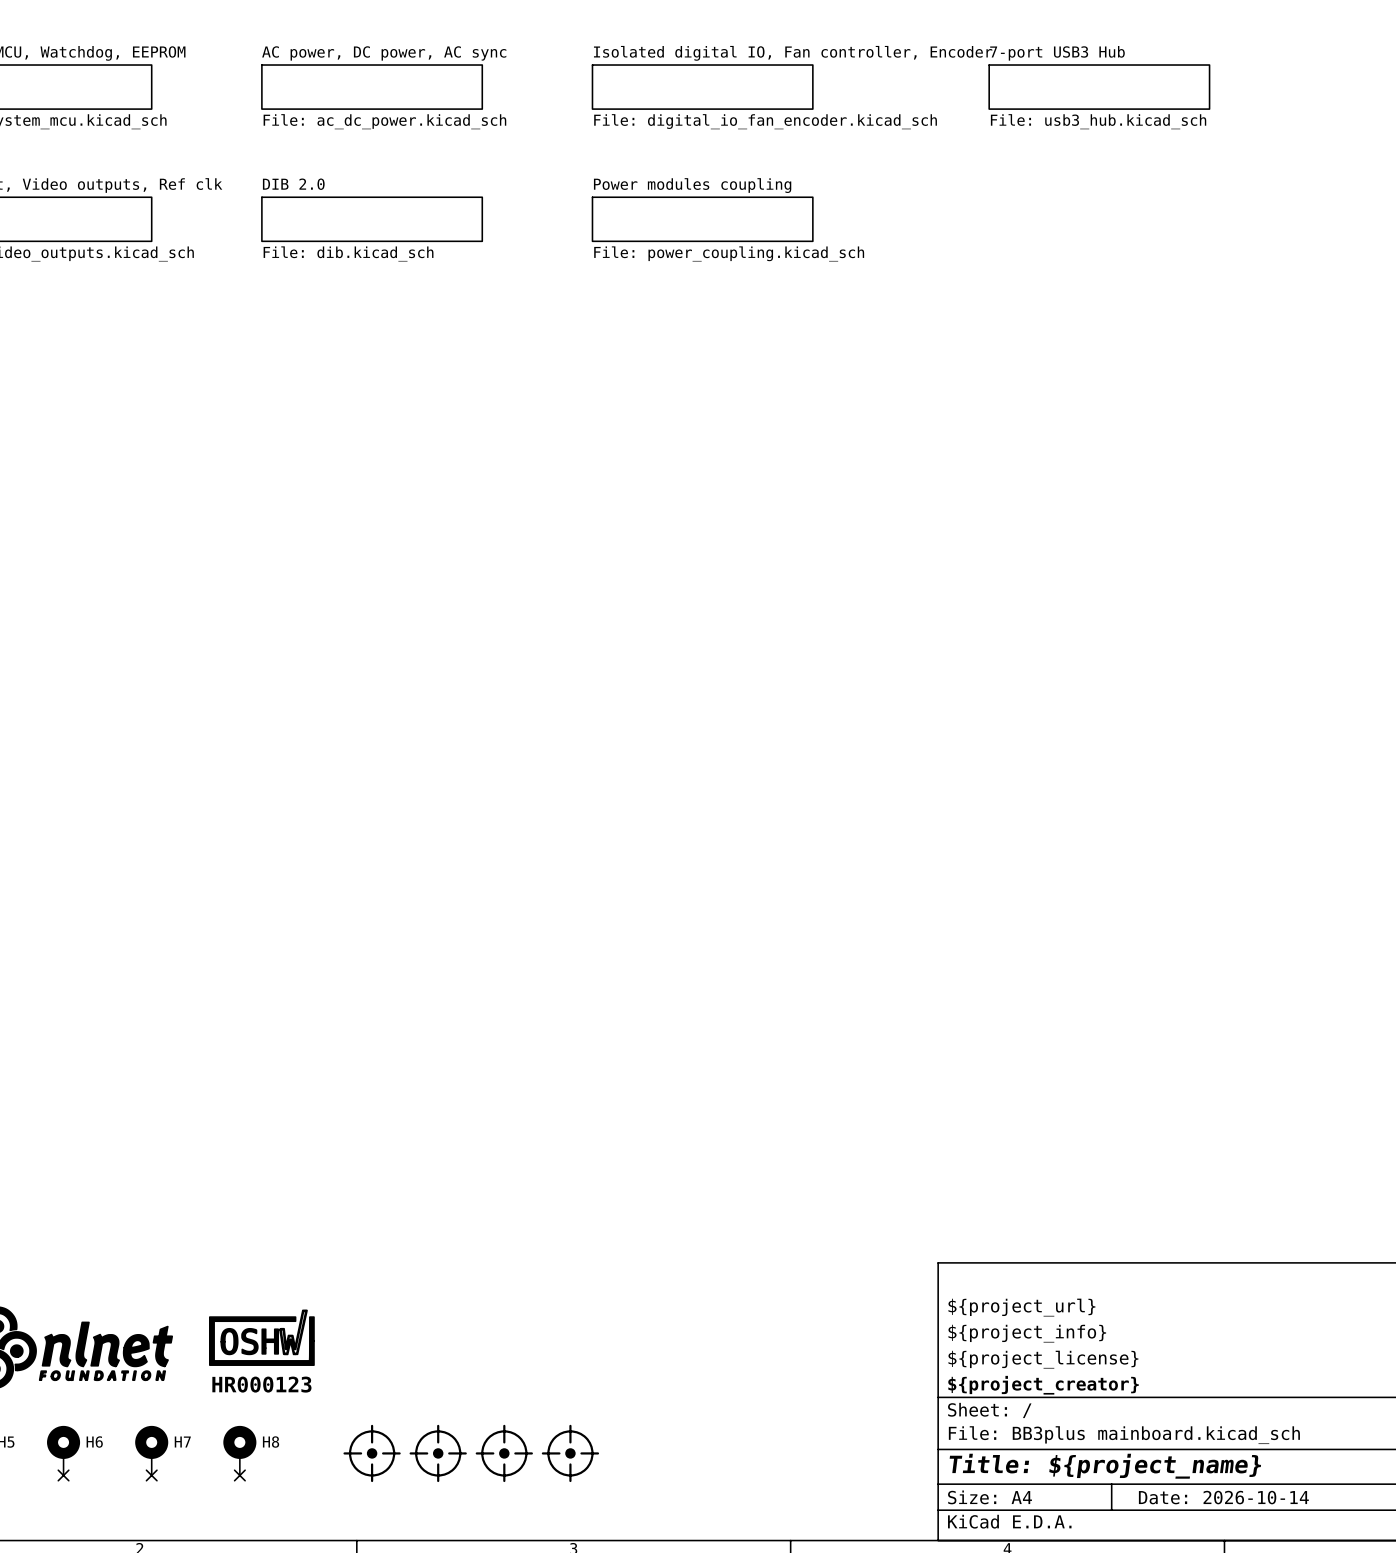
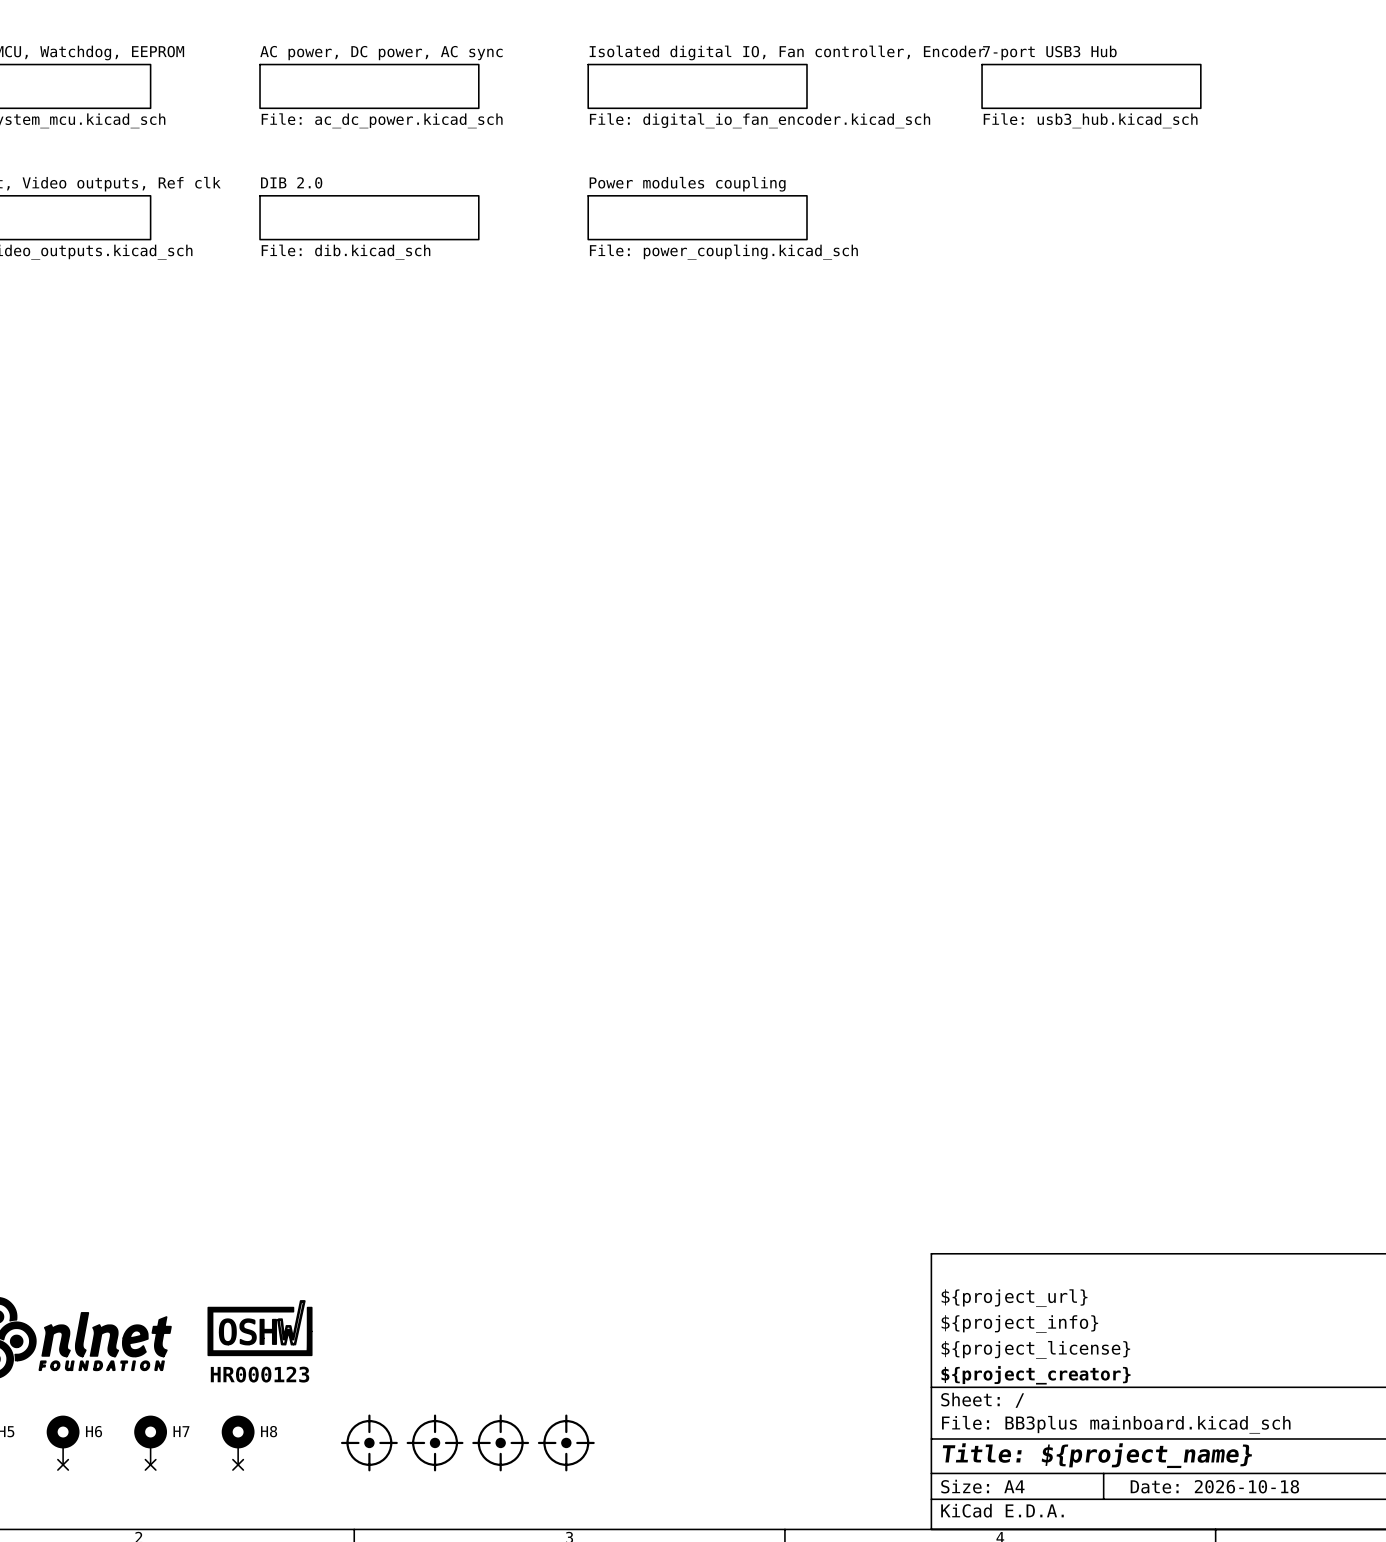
title block: Date: 2026-10-14 (1223, 1497) -> Date: 2026-10-18 (1214, 1486)

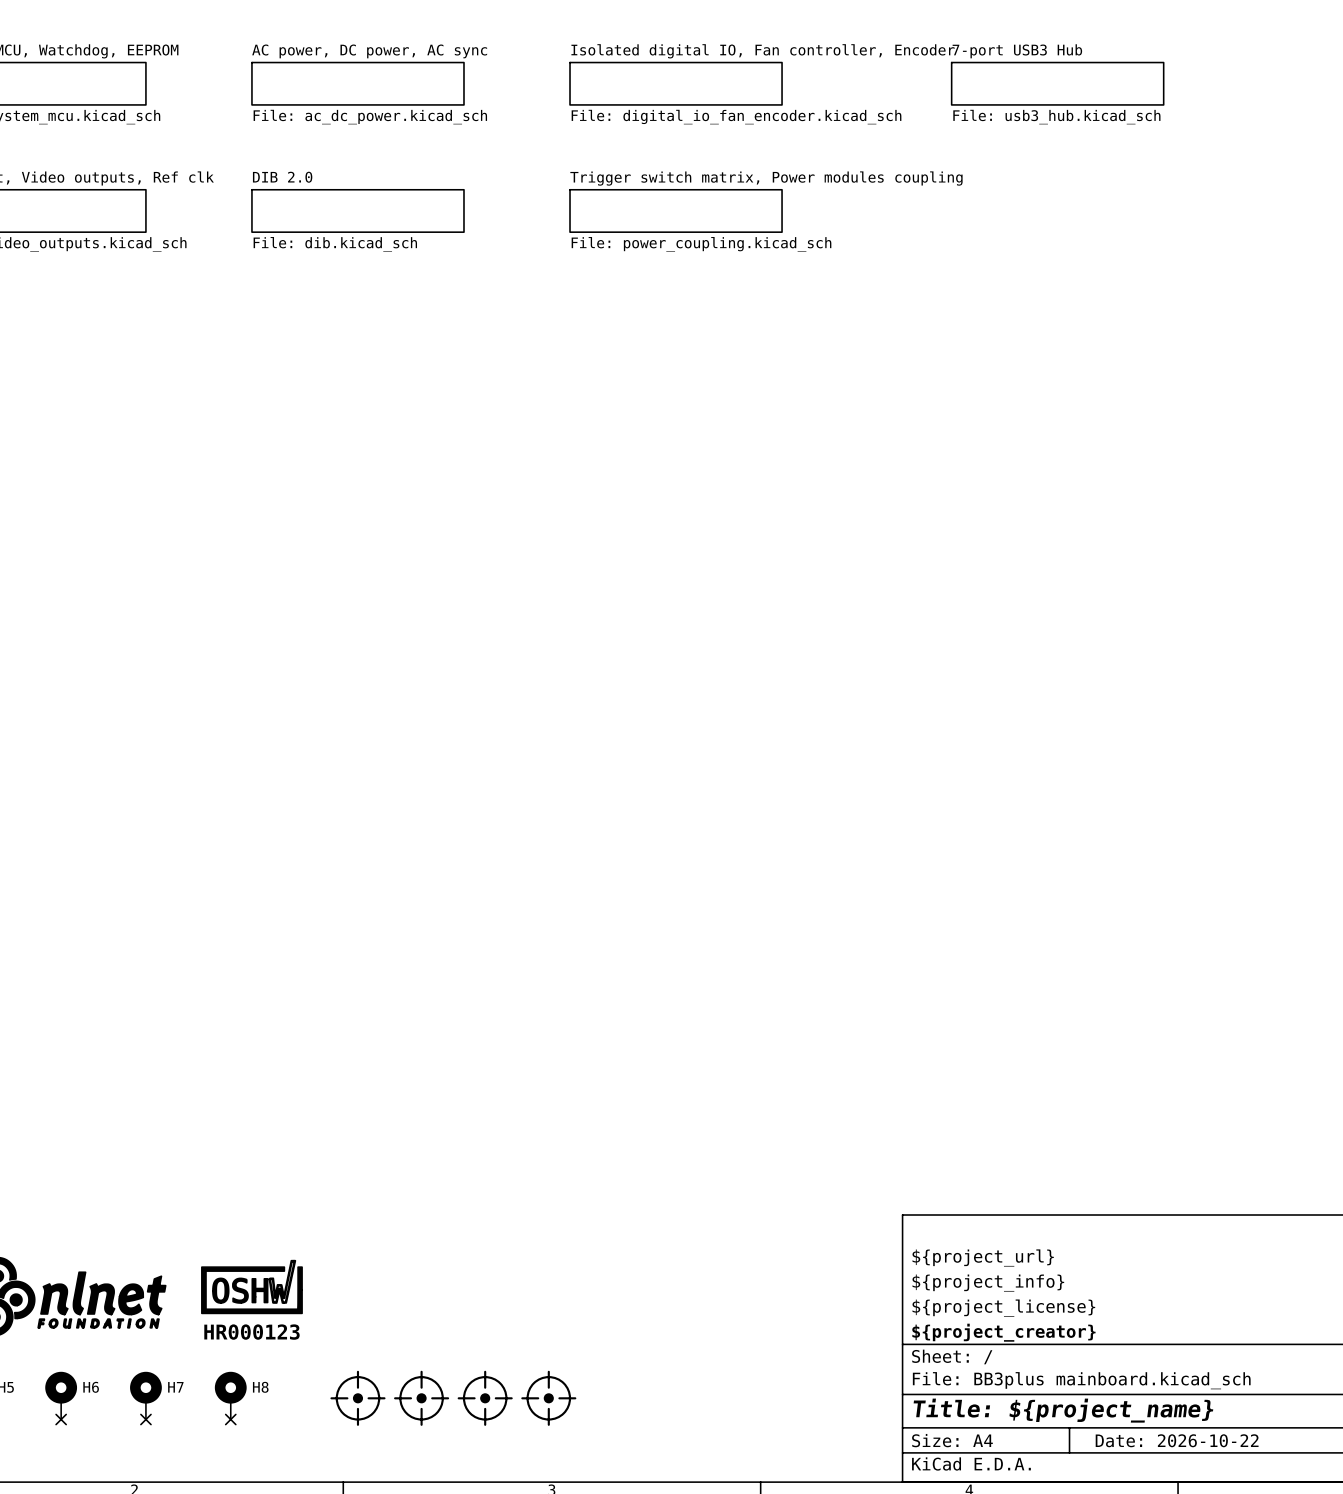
sheet Power modules coupling name: Power modules coupling (687, 184) -> Trigger switch matrix, Power modules coupling (766, 178)
title block: Date: 2026-10-18 (1214, 1486) -> Date: 2026-10-22 (1177, 1440)

